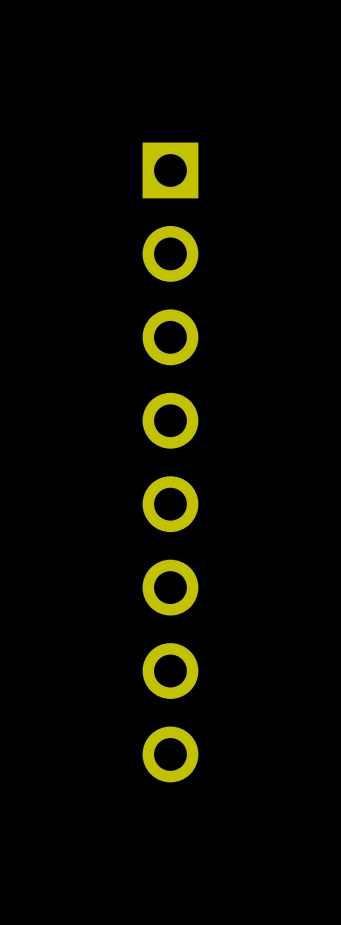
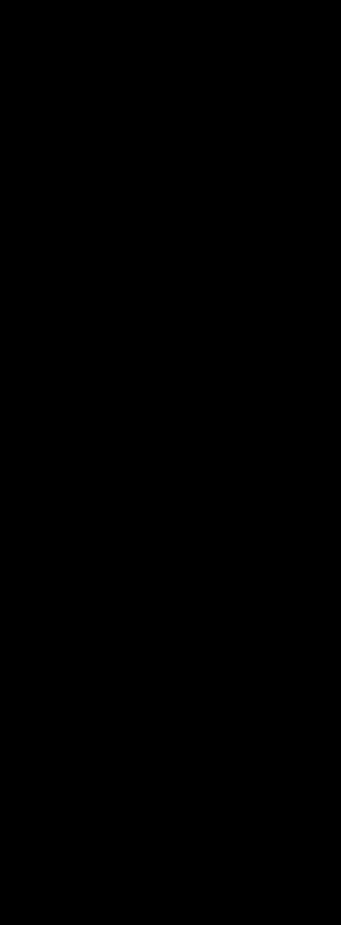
part: (170, 462) -> none

